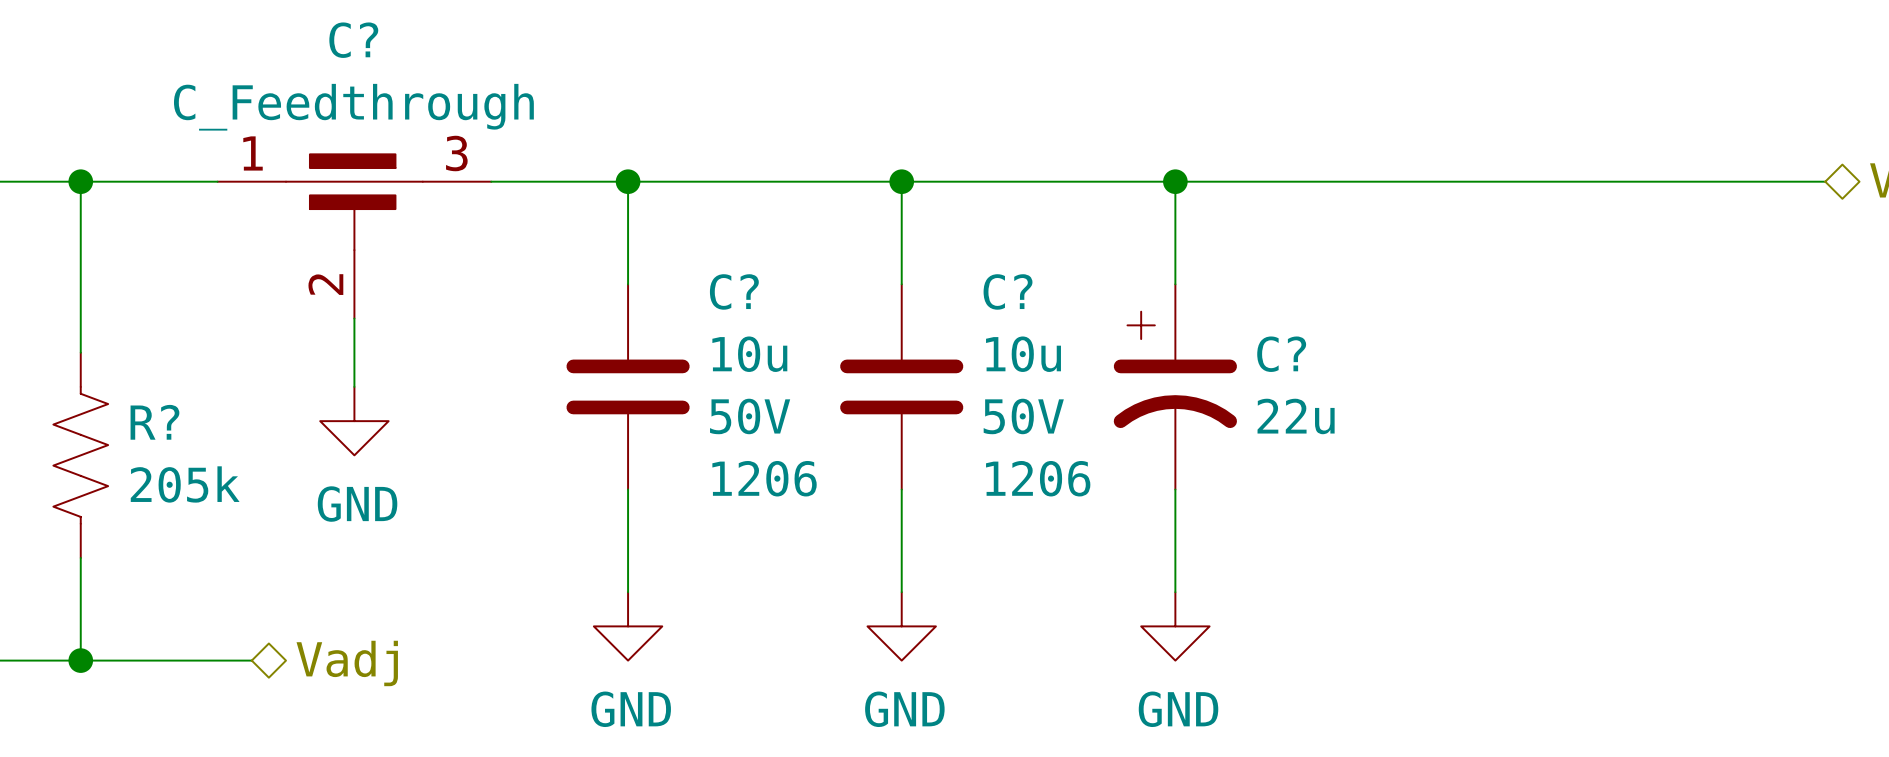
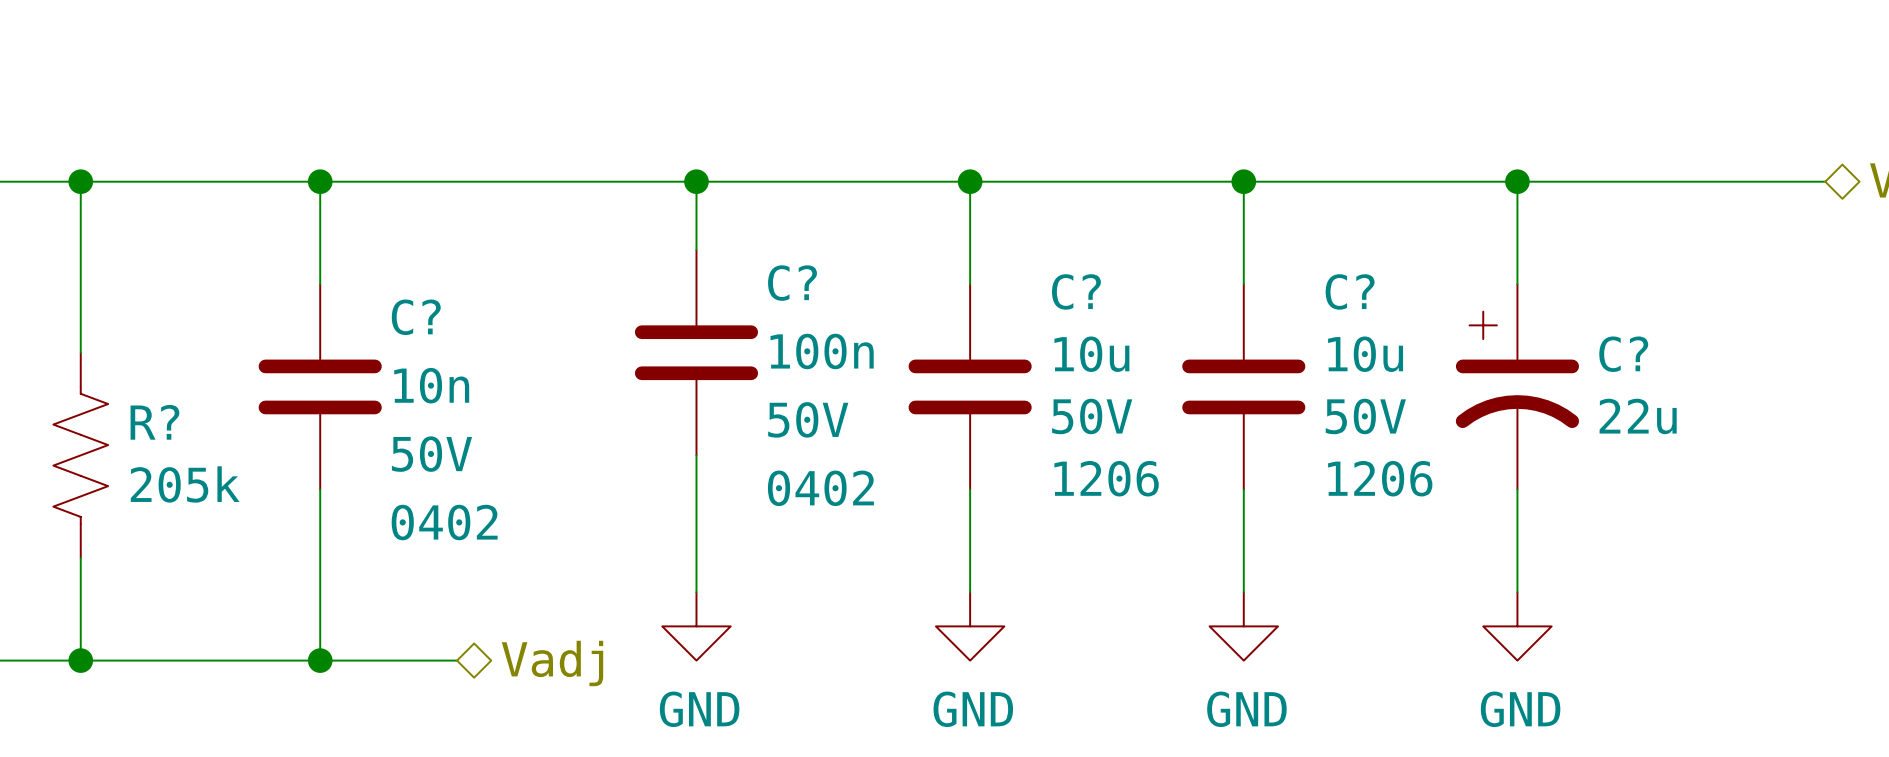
wire: none -> (320, 181) (320, 284)
junction: none -> (320, 181)
wire: (628, 181) (628, 284) -> (970, 181) (970, 284)
junction position: (628, 181) -> (696, 181)
wire: (901, 181) (901, 284) -> (1243, 181) (1243, 284)
junction position: (901, 181) -> (970, 181)
wire: (1175, 181) (1175, 284) -> (1517, 181) (1517, 284)
junction position: (1175, 181) -> (1243, 181)
junction: none -> (1517, 181)
C?: C_Feedthrough (354, 236) -> none
wire: (354, 318) (354, 386) -> (696, 181) (696, 250)
C?: none -> 100n (696, 352)
C?: none -> 10n (320, 386)
C?: 10u (628, 386) -> none
C? position: (901, 386) -> (970, 386)
C? position: (1175, 386) -> (1517, 386)
C?: none -> 10u (1243, 386)
power symbol: GND (354, 421) -> none
wire: none -> (696, 455) (696, 592)
wire: none -> (320, 489) (320, 660)
wire: (628, 489) (628, 592) -> (970, 489) (970, 592)
wire: (901, 489) (901, 592) -> (1243, 489) (1243, 592)
wire: (1175, 489) (1175, 592) -> (1517, 489) (1517, 592)
power symbol position: GND (628, 626) -> GND (696, 626)
power symbol position: GND (901, 626) -> GND (970, 626)
power symbol position: GND (1175, 626) -> GND (1243, 626)
power symbol: none -> GND (1517, 626)
wire: none -> (251, 660) (457, 660)
junction: none -> (320, 660)
hierarchical label position: Vadj (347, 663) -> Vadj (552, 663)

